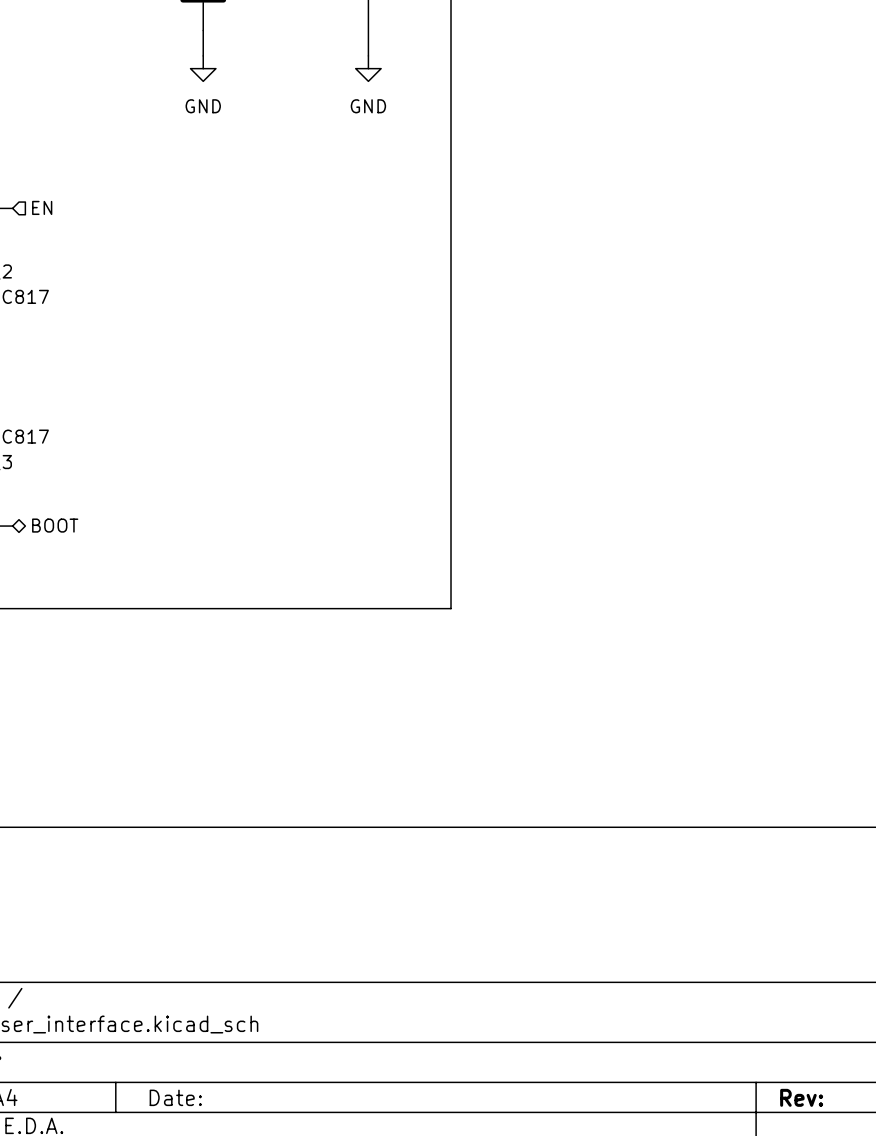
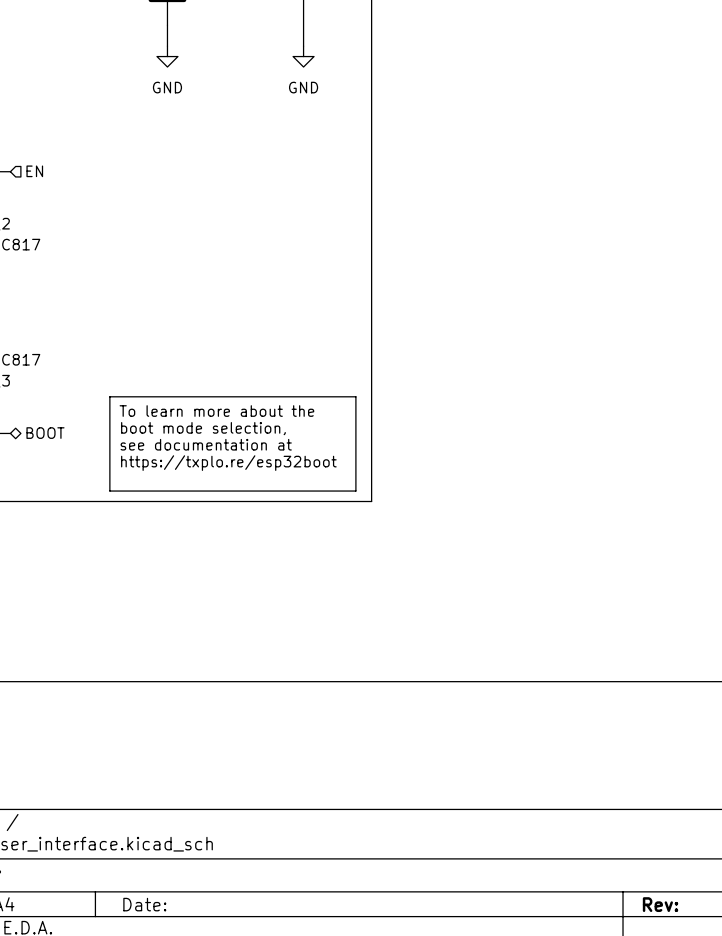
line: none -> (109, 396) (355, 396) (355, 491) (109, 491) (109, 396)
text: none -> To learn more about the (216, 411)
text: none -> boot mode selection, (203, 428)
text: none -> see documentation at (206, 444)
text: none -> https://txplo.re/esp32boot (228, 463)

